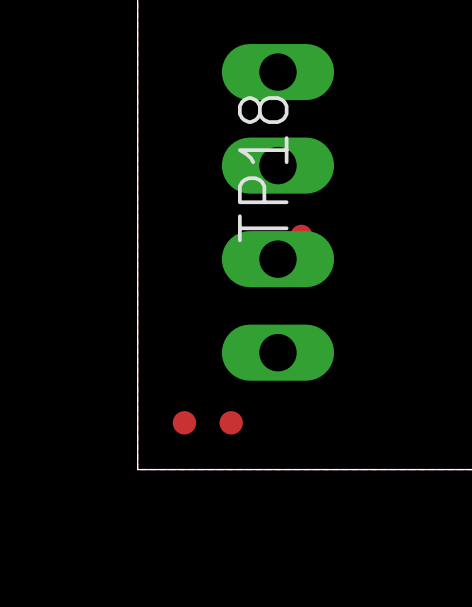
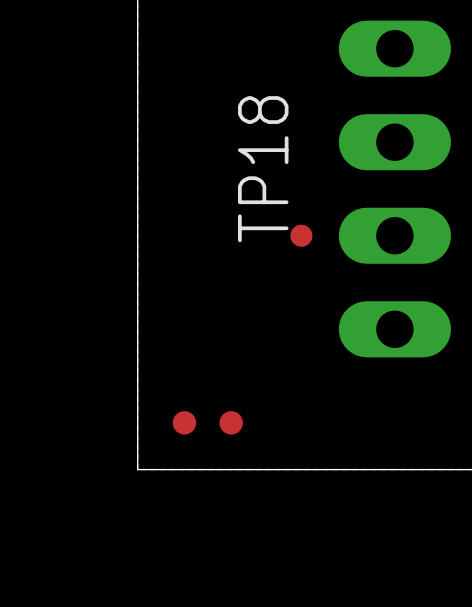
part position: (277, 212) -> (394, 188)

